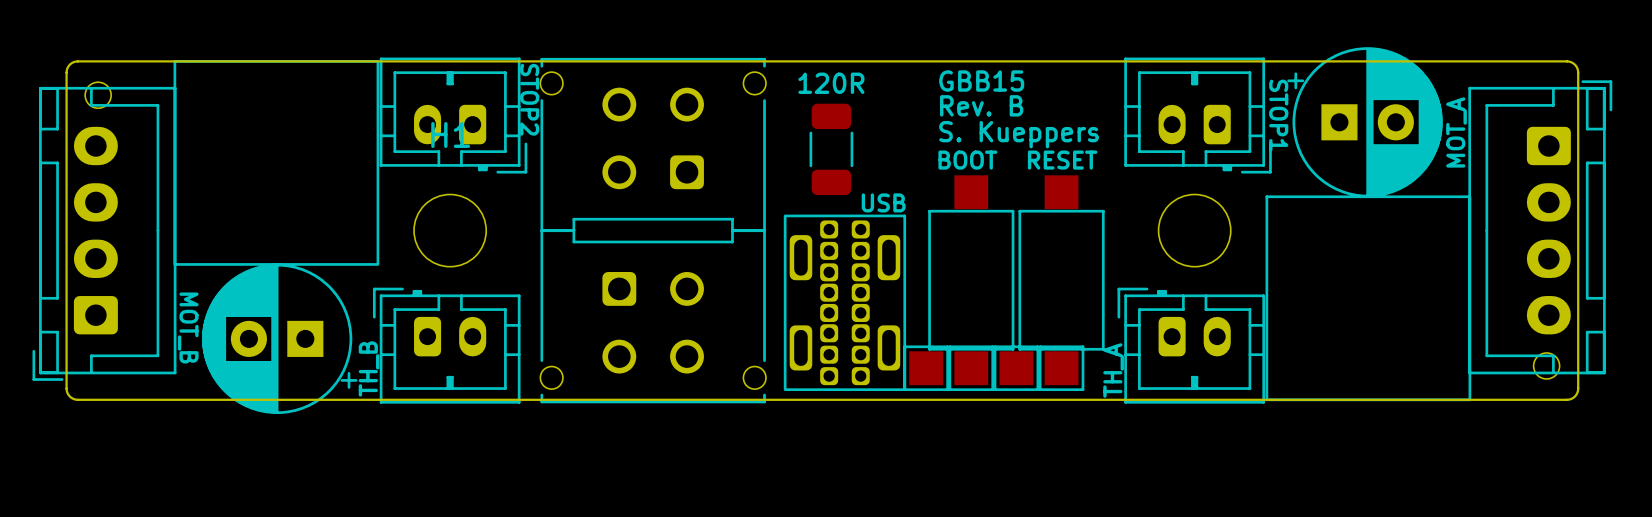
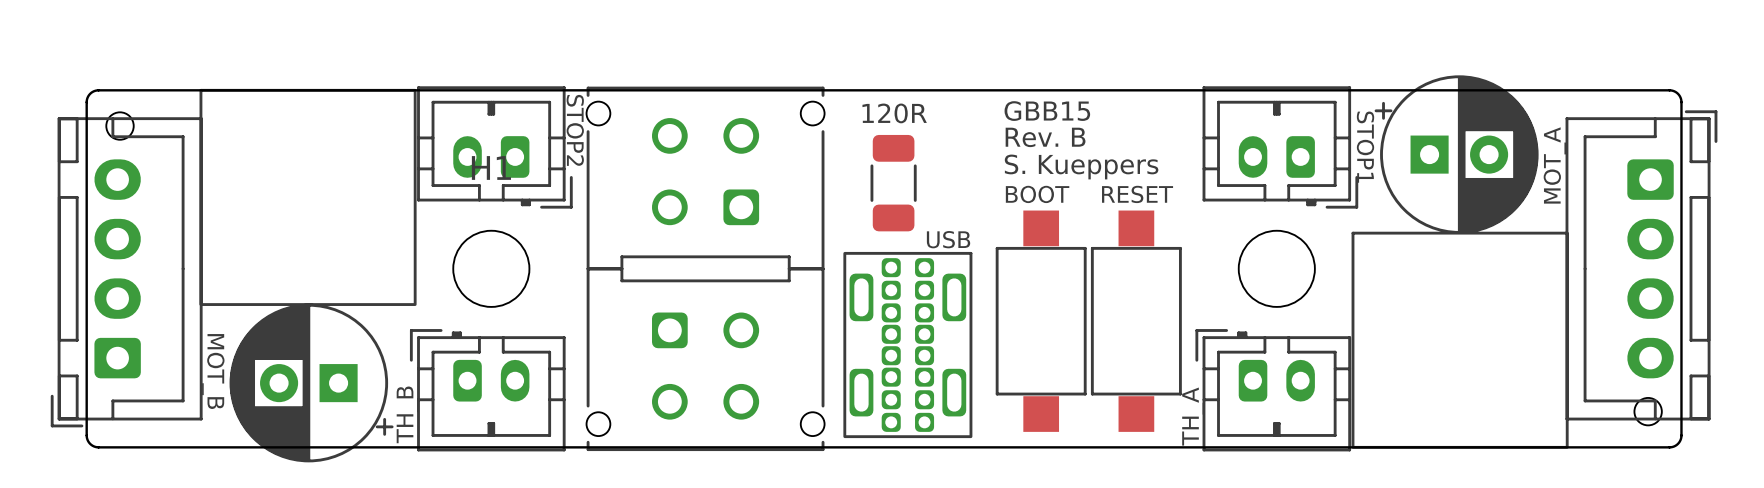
line: (949, 346) (992, 346) (992, 389) (949, 389) (949, 346) -> none
line: (1040, 346) (1082, 346) (1082, 389) (1040, 389) (1040, 346) -> none
part: (926, 368) -> none
part: (1016, 368) -> none

